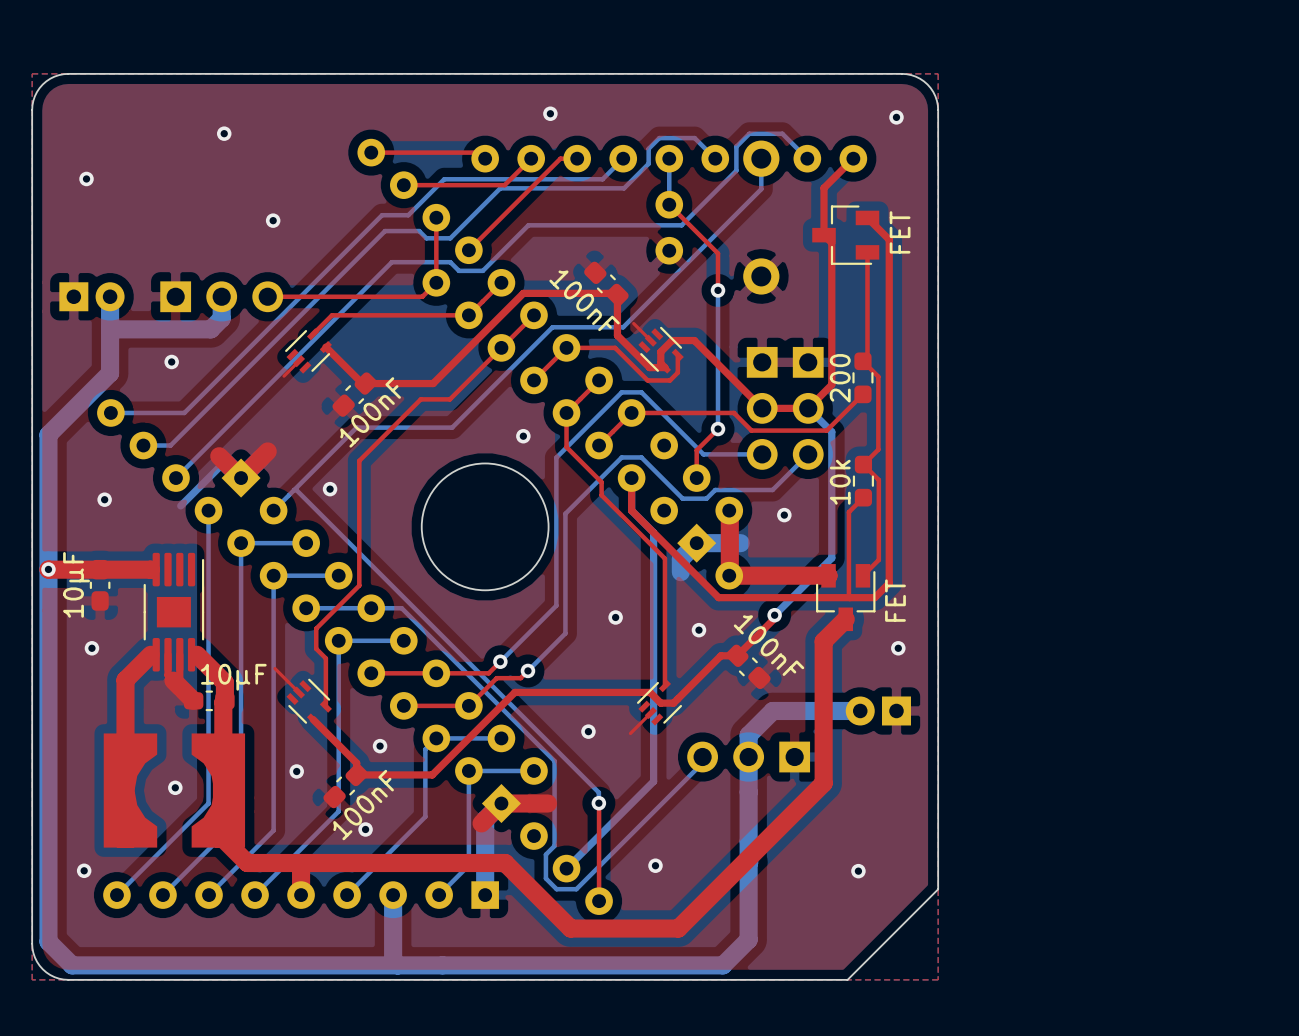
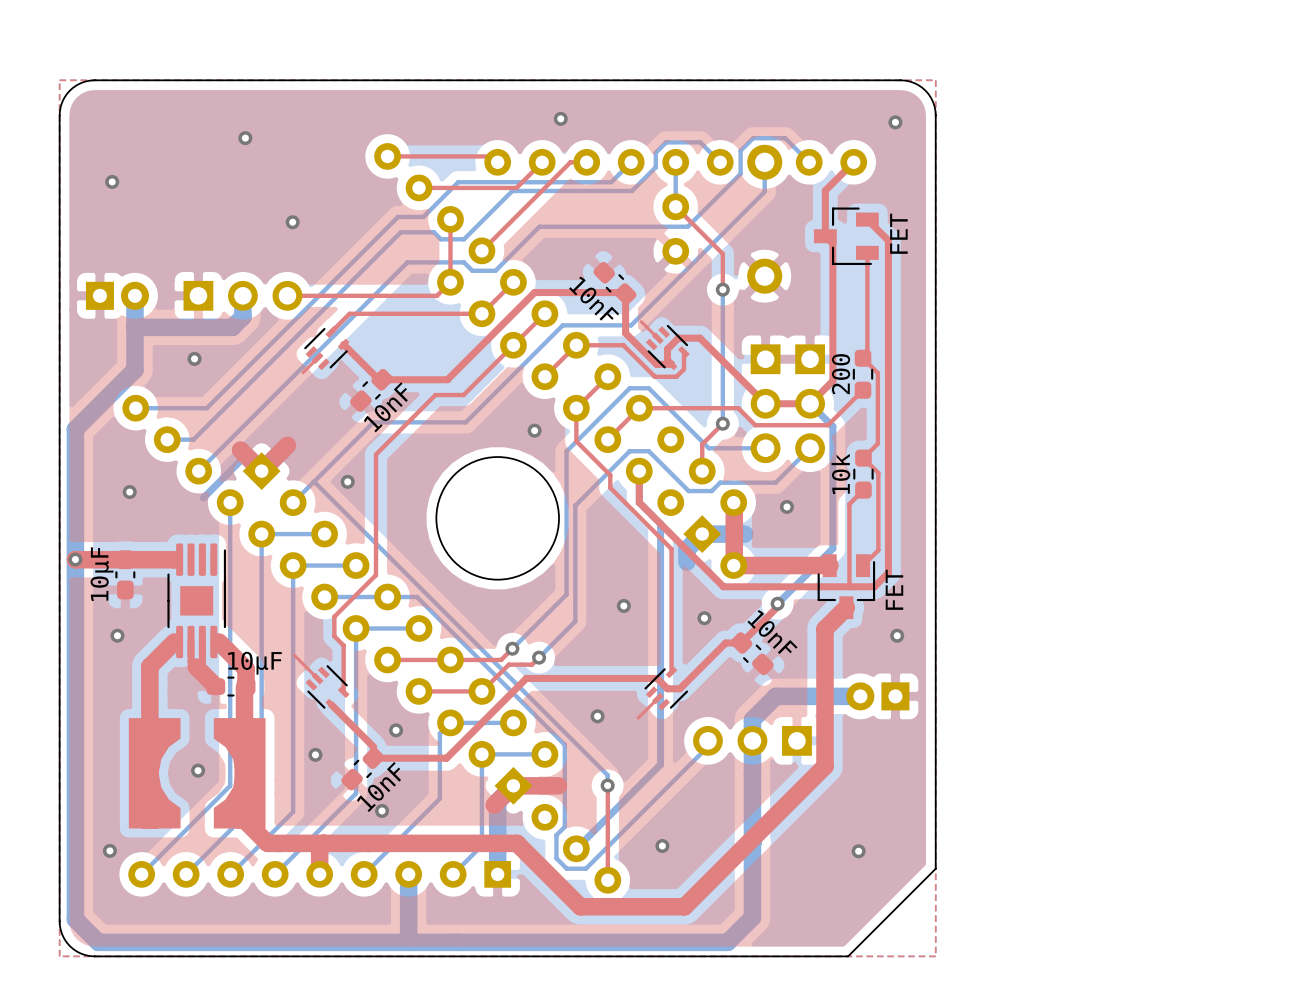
part value: 100nF (584, 300) -> 10nF (594, 298)
part value: 100nF (370, 412) -> 10nF (385, 407)
part value: 100nF (769, 645) -> 10nF (772, 632)
part value: 100nF (363, 805) -> 10nF (379, 786)

